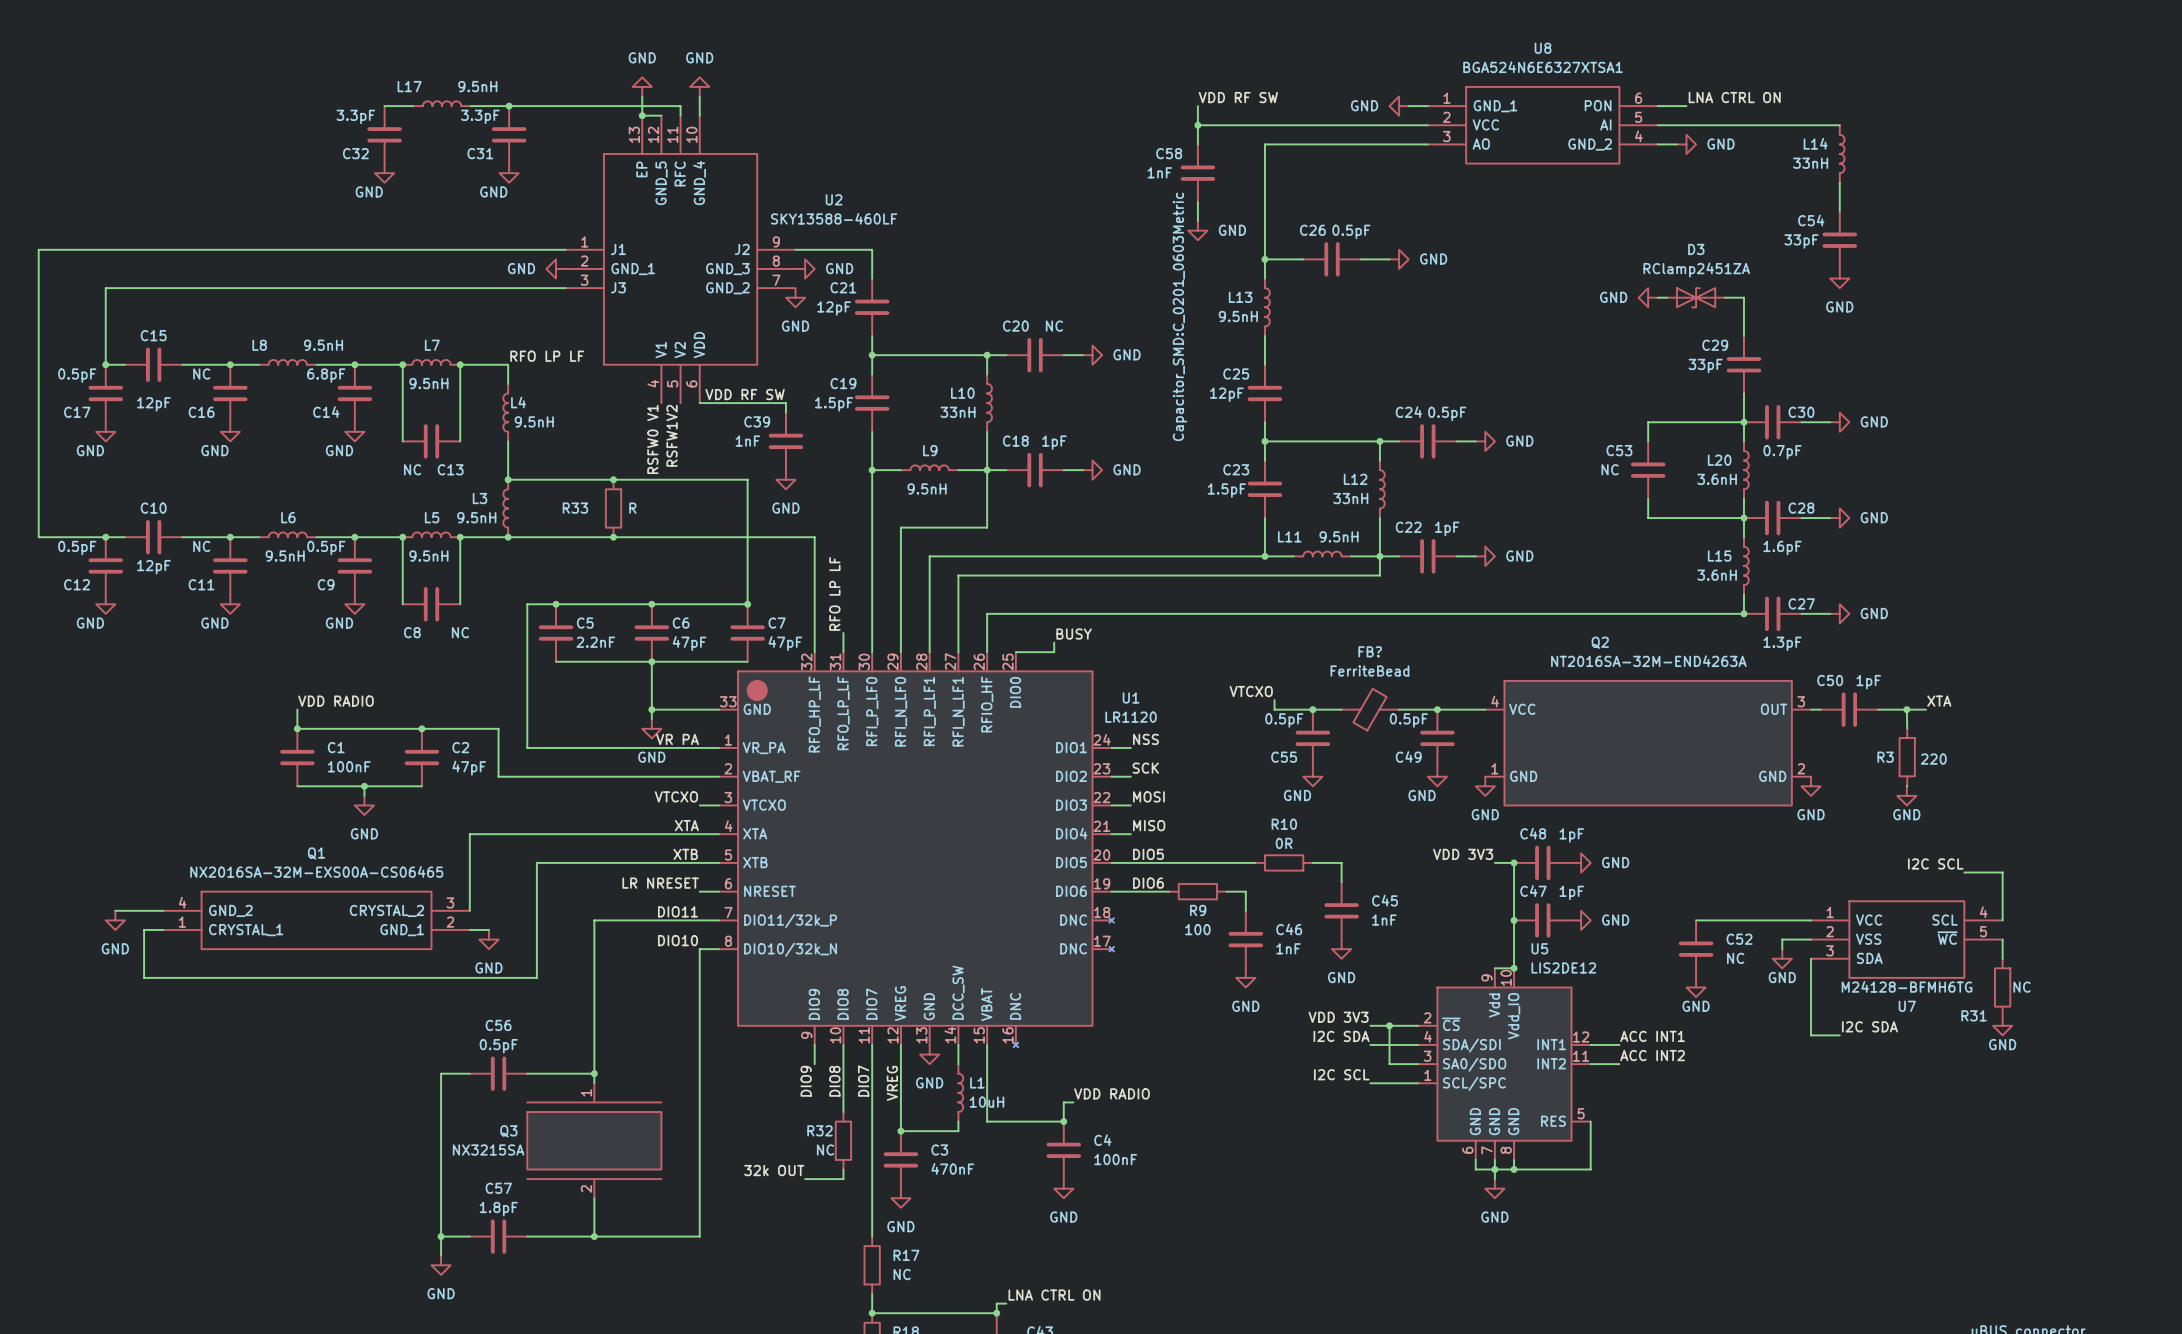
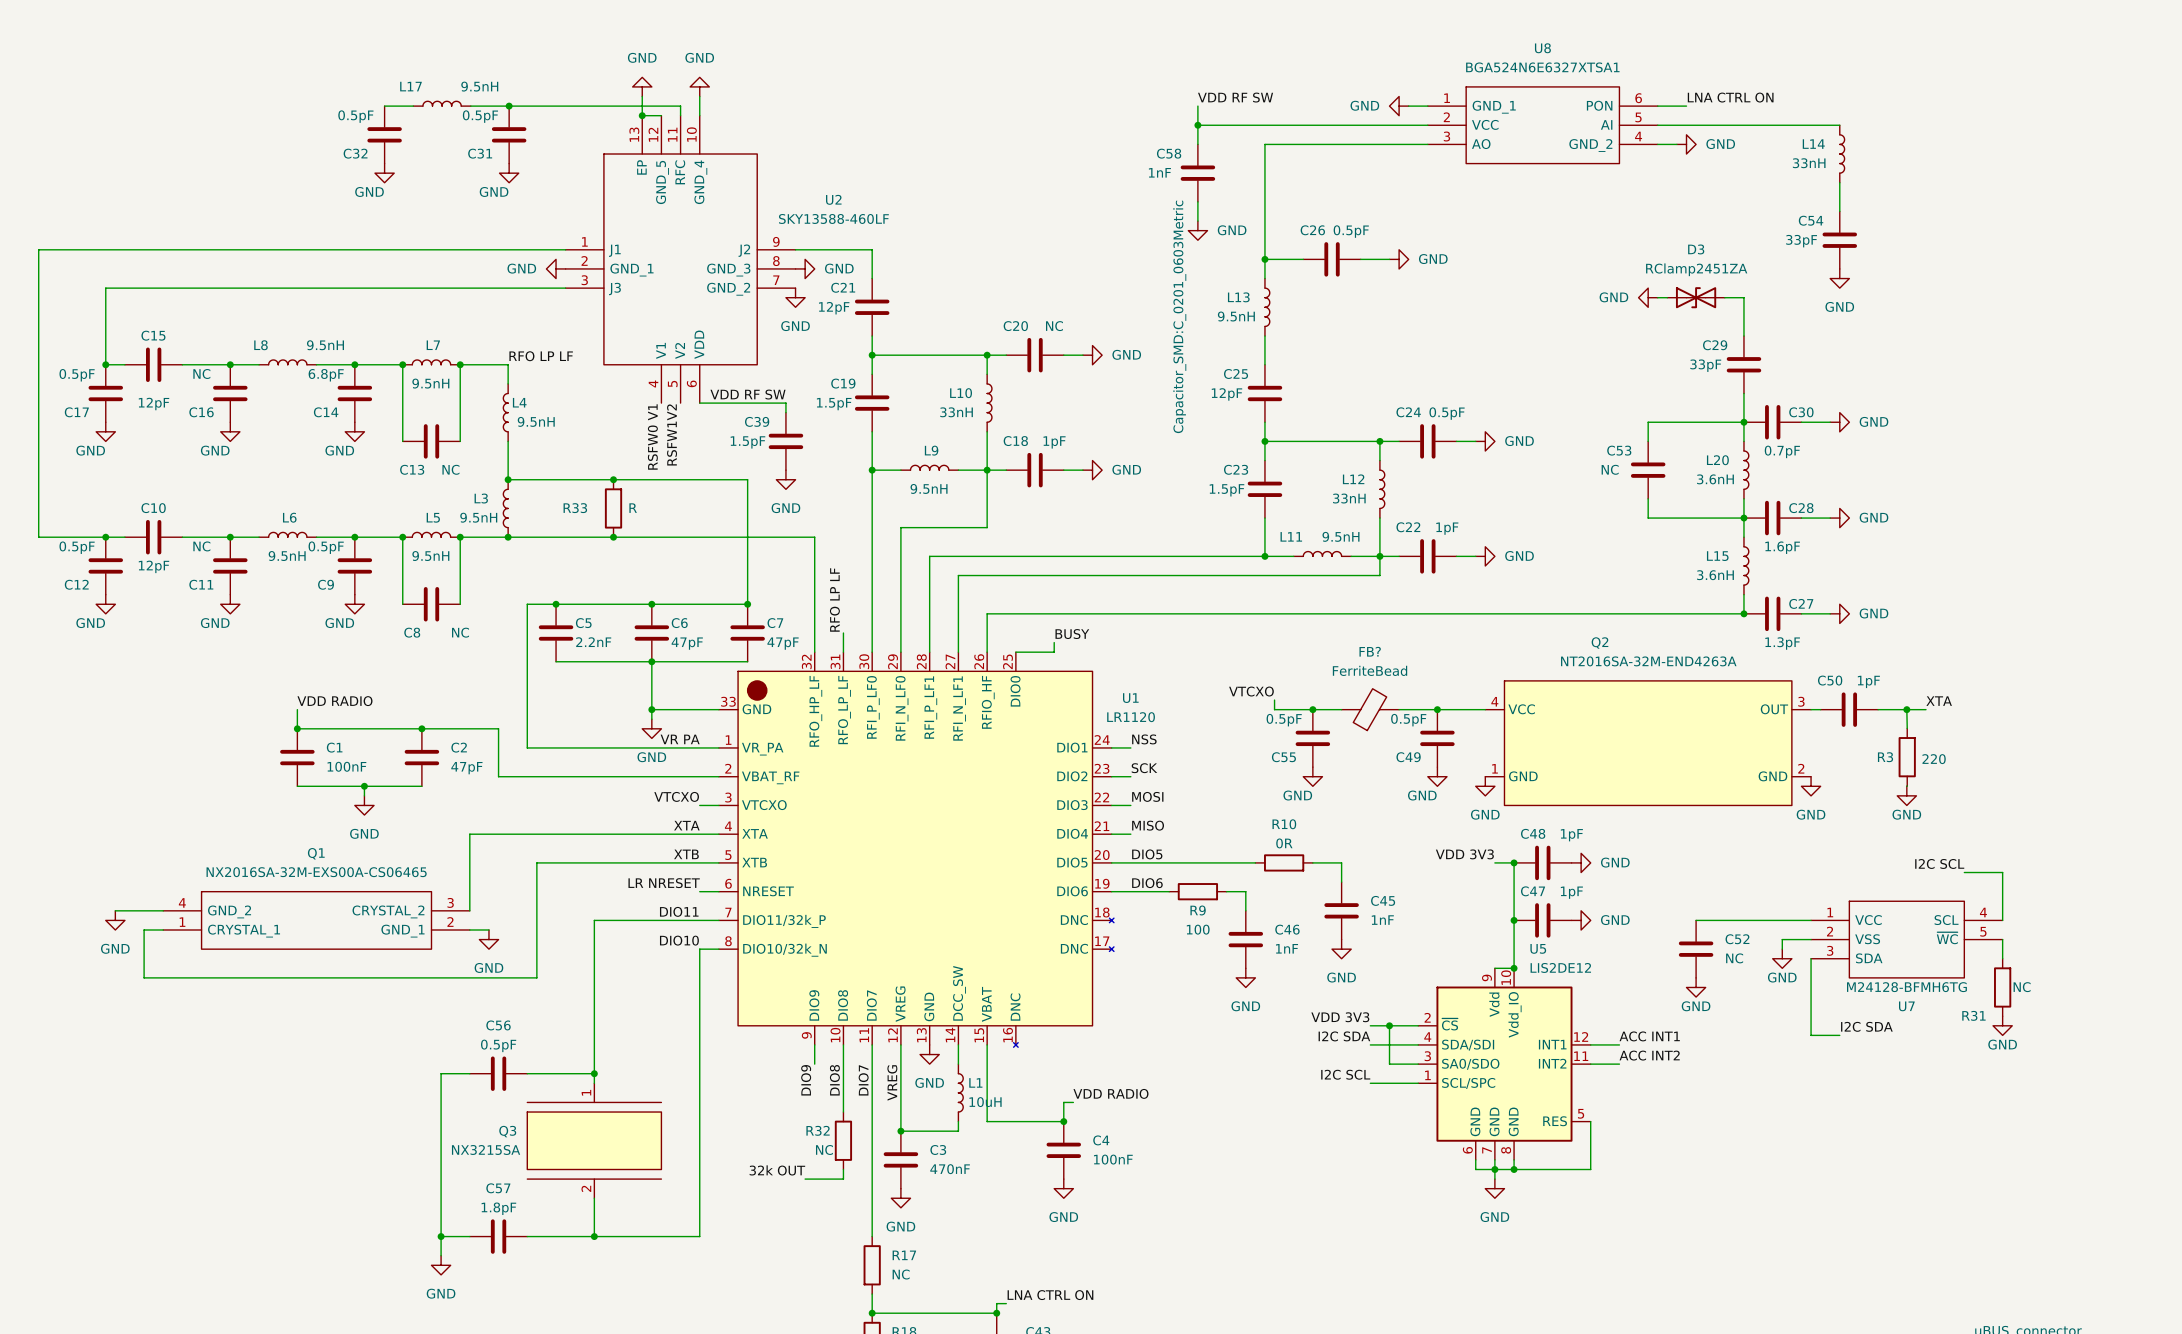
C32 value: 3.3pF (355, 116) -> 0.5pF (355, 116)
C31 value: 3.3pF (480, 116) -> 0.5pF (480, 116)
C39 value: 1nF (747, 441) -> 1.5pF (747, 442)
C13 value position: NC (412, 469) -> NC (450, 469)
C13 name position: C13 (450, 469) -> C13 (412, 469)

